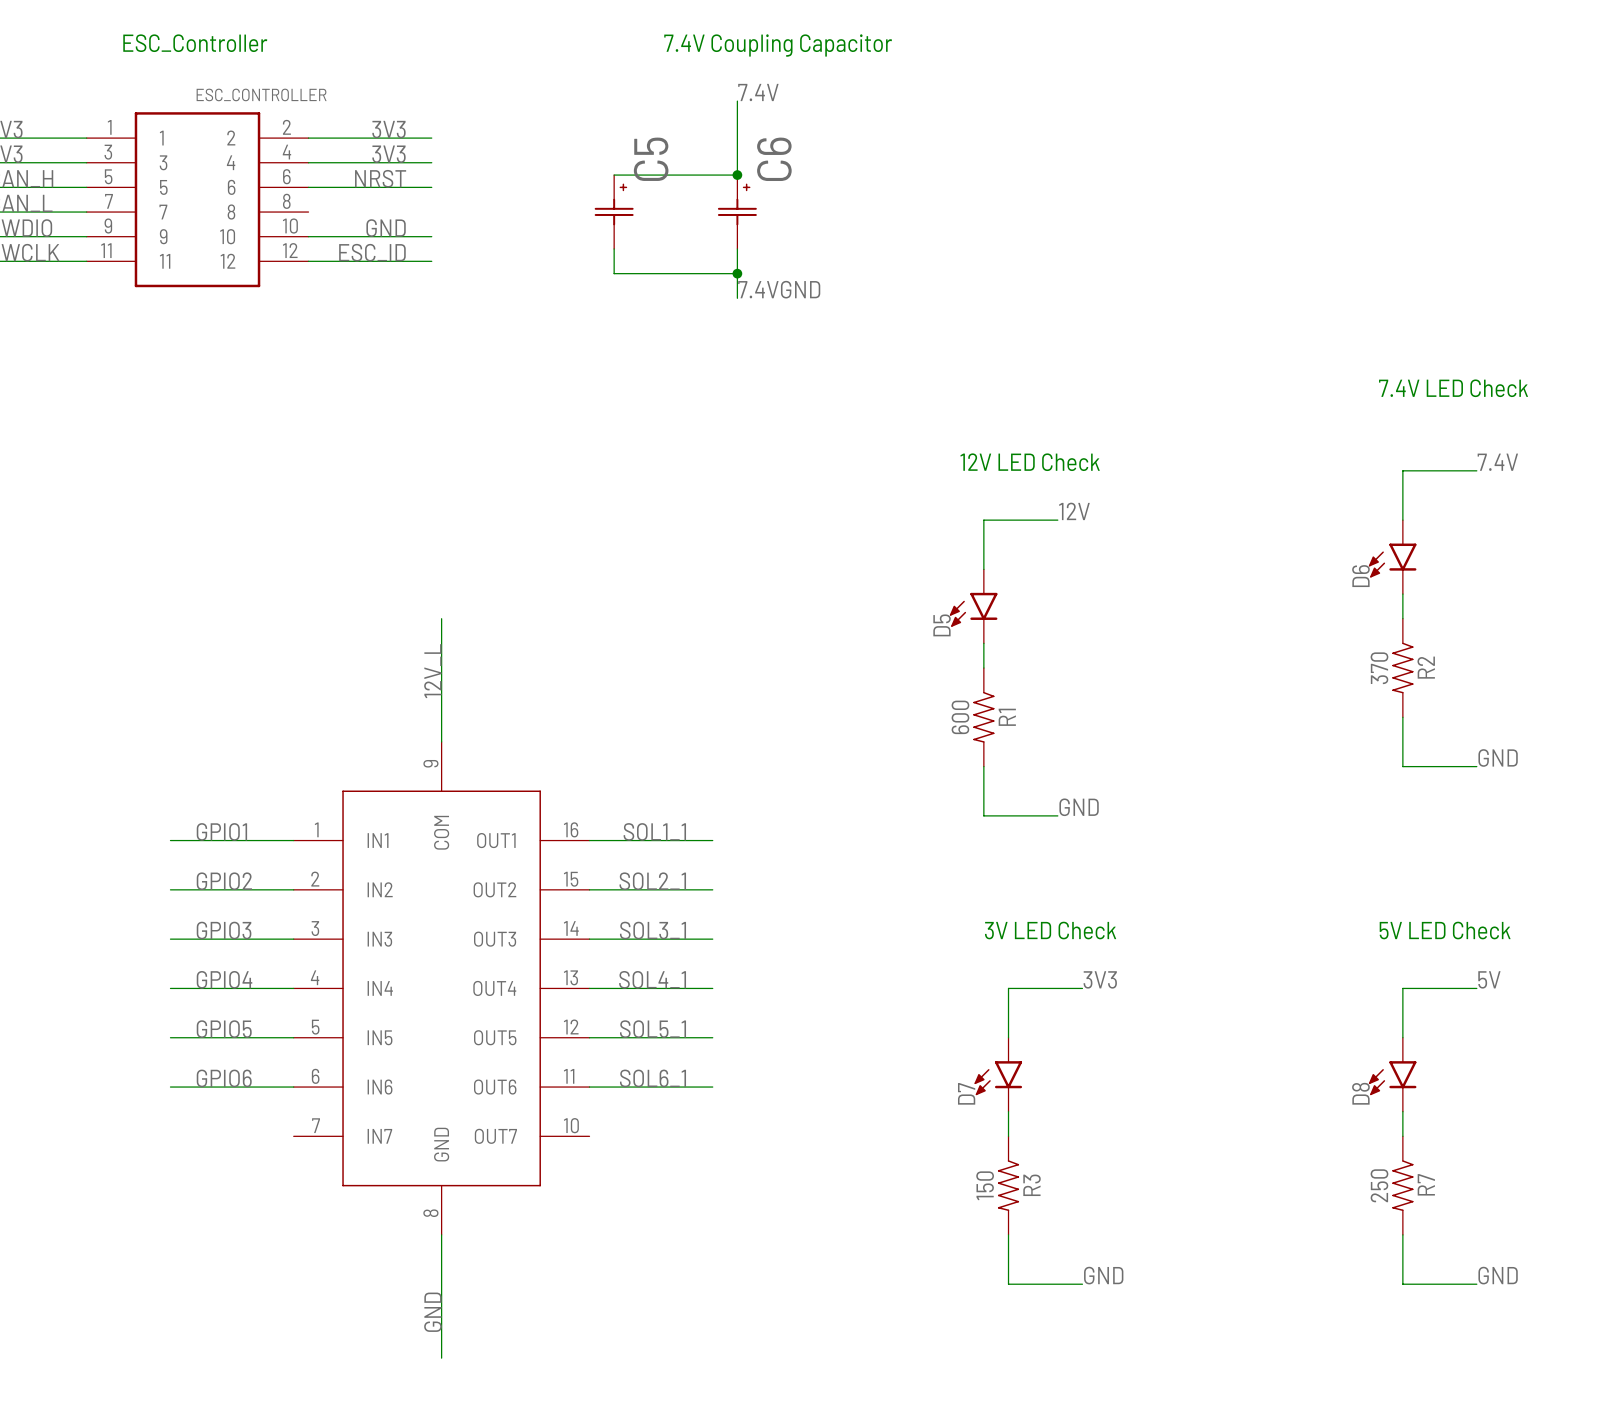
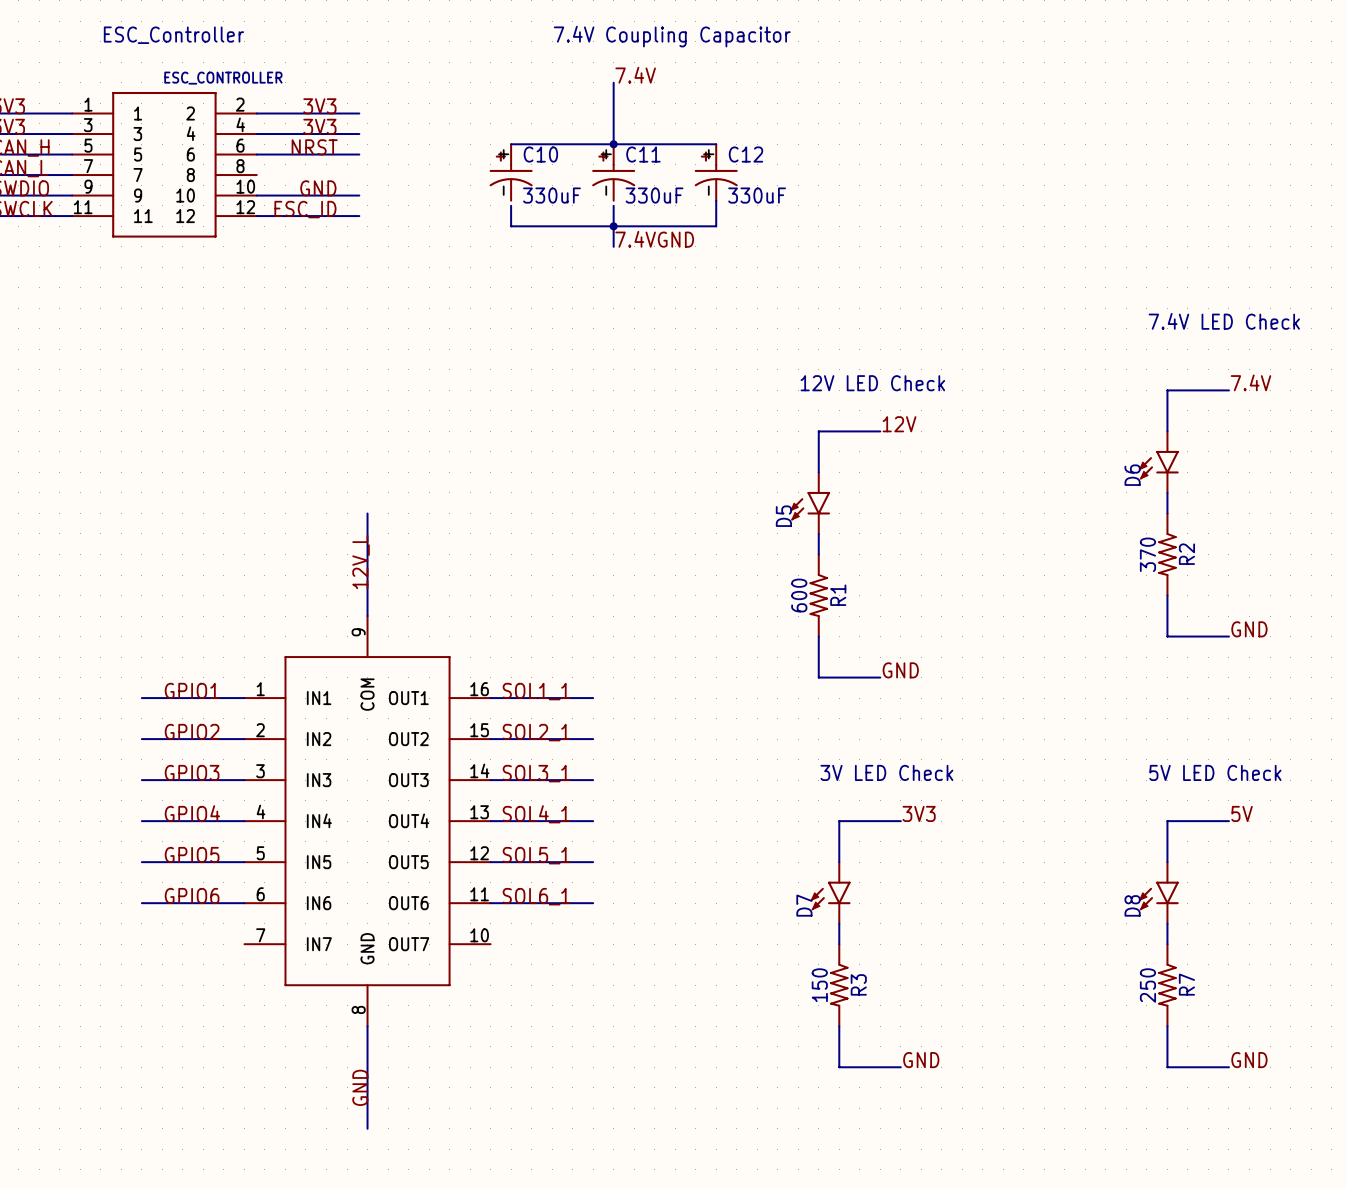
wire: none -> (613, 144) (716, 144)
C10: none -> 330uF (511, 172)
C11: none -> 330uF (613, 172)
C12: none -> 330uF (716, 172)
C5: (614, 212) -> none
C6: (737, 212) -> none
wire: none -> (716, 200) (716, 226) (613, 226)

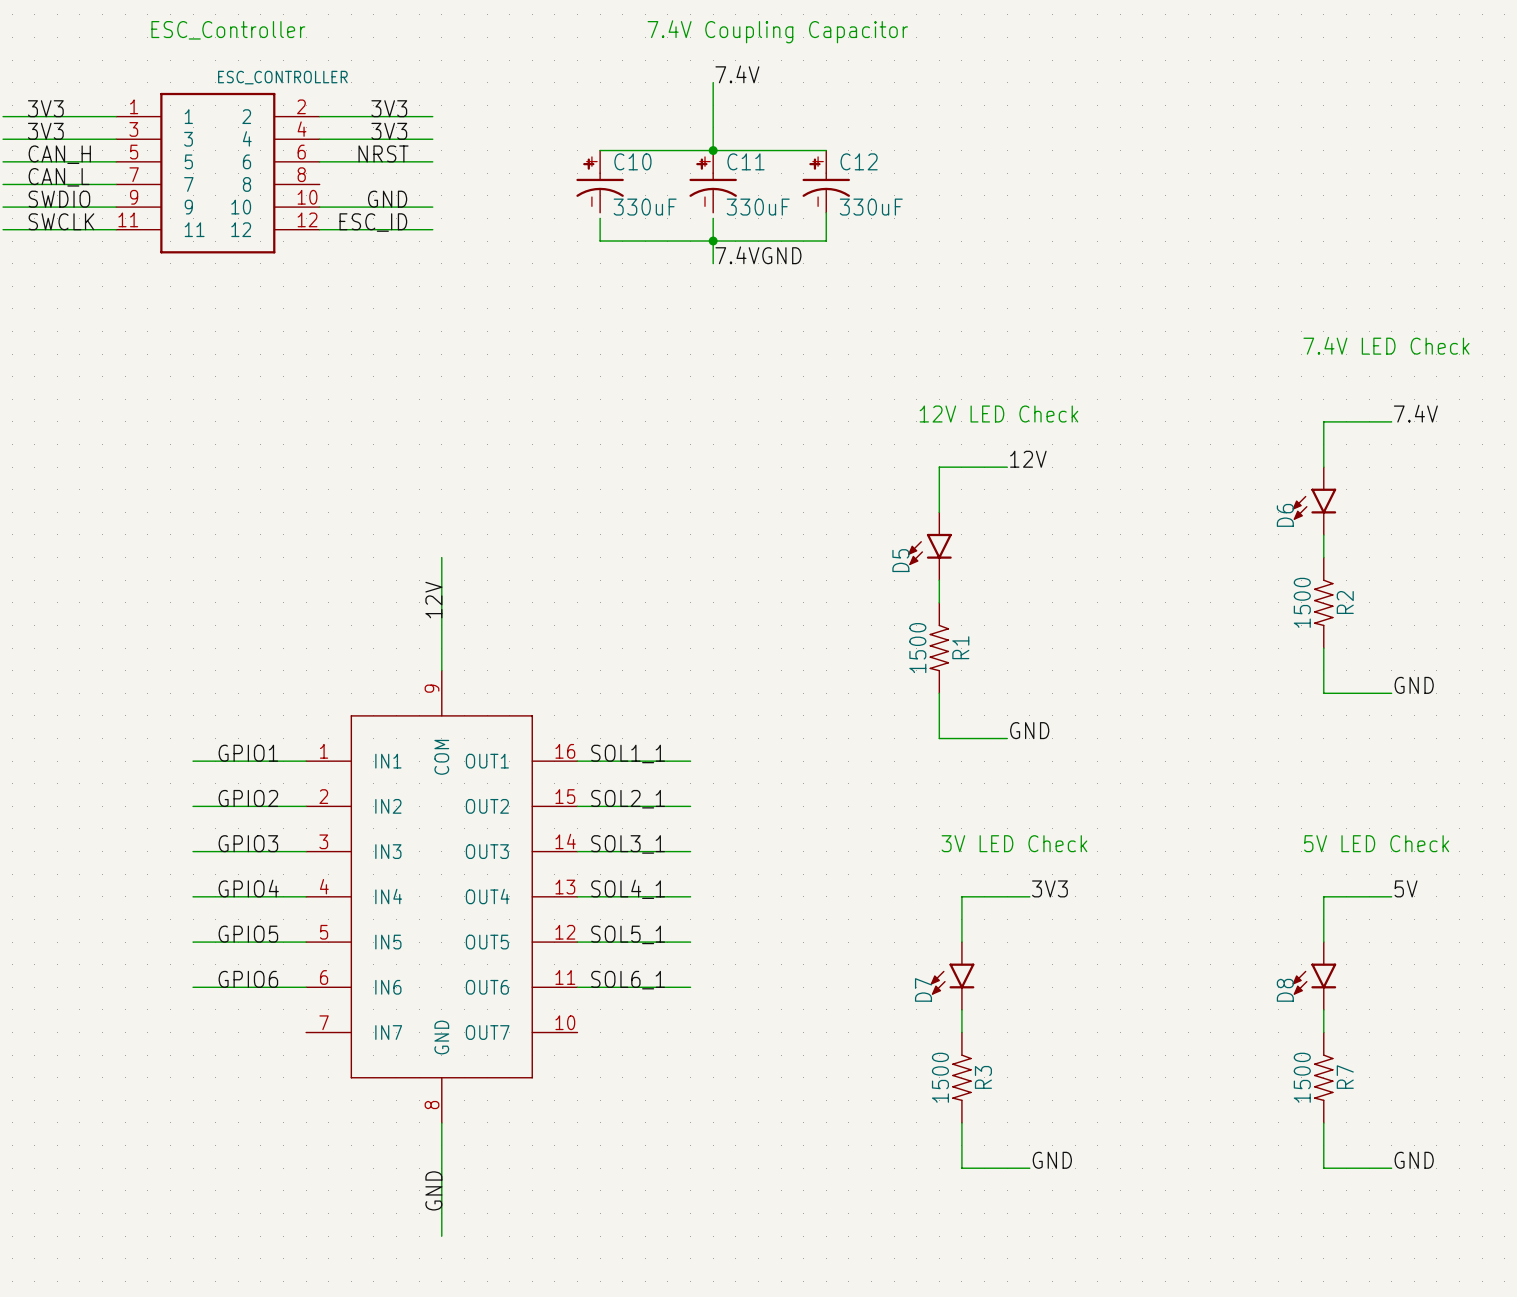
R2 value: 370 (1147, 554) -> 1500 (1302, 602)
label: 12V_L (361, 562) -> 12V (433, 600)
R1 value: 600 (799, 595) -> 1500 (917, 648)
R3 value: 150 (819, 985) -> 1500 (940, 1077)
R7 value: 250 (1147, 985) -> 1500 (1302, 1077)

